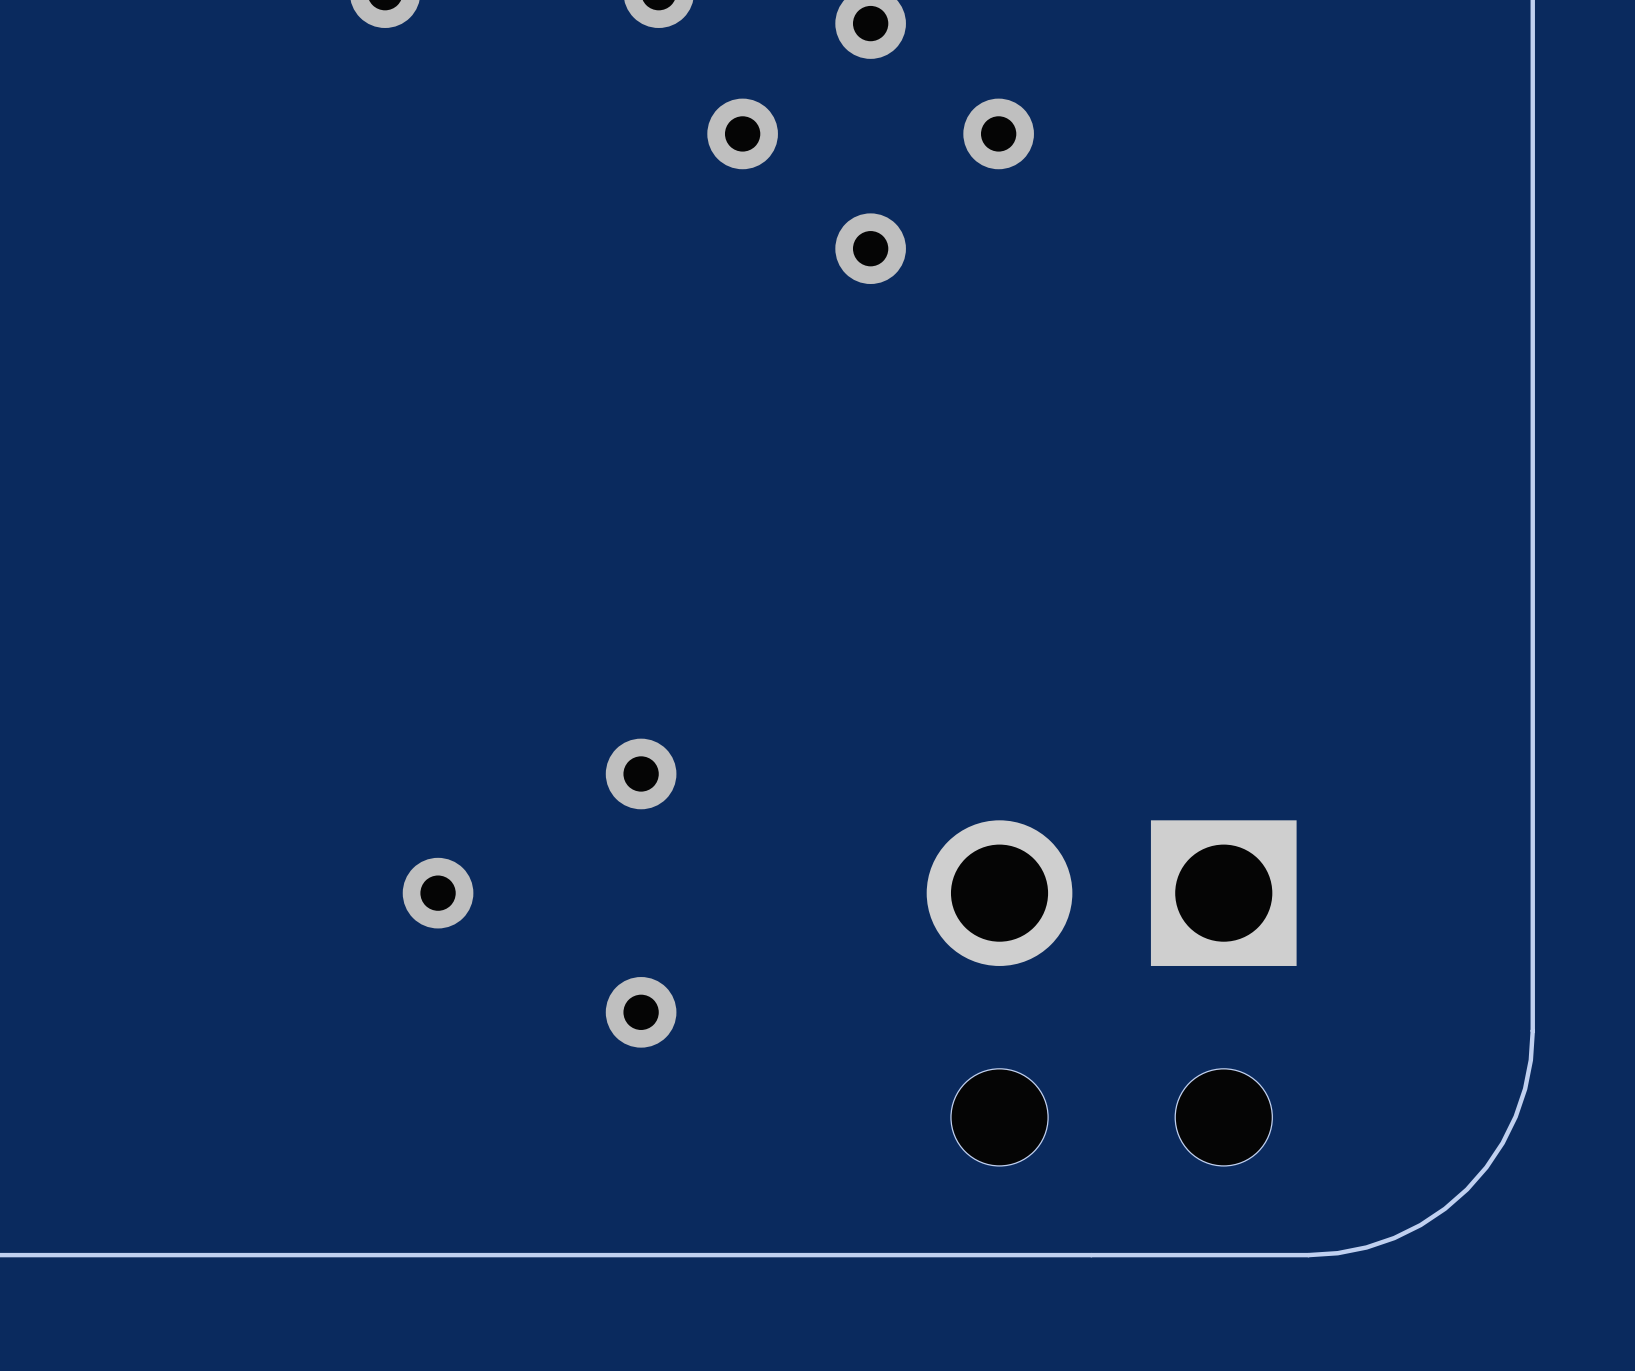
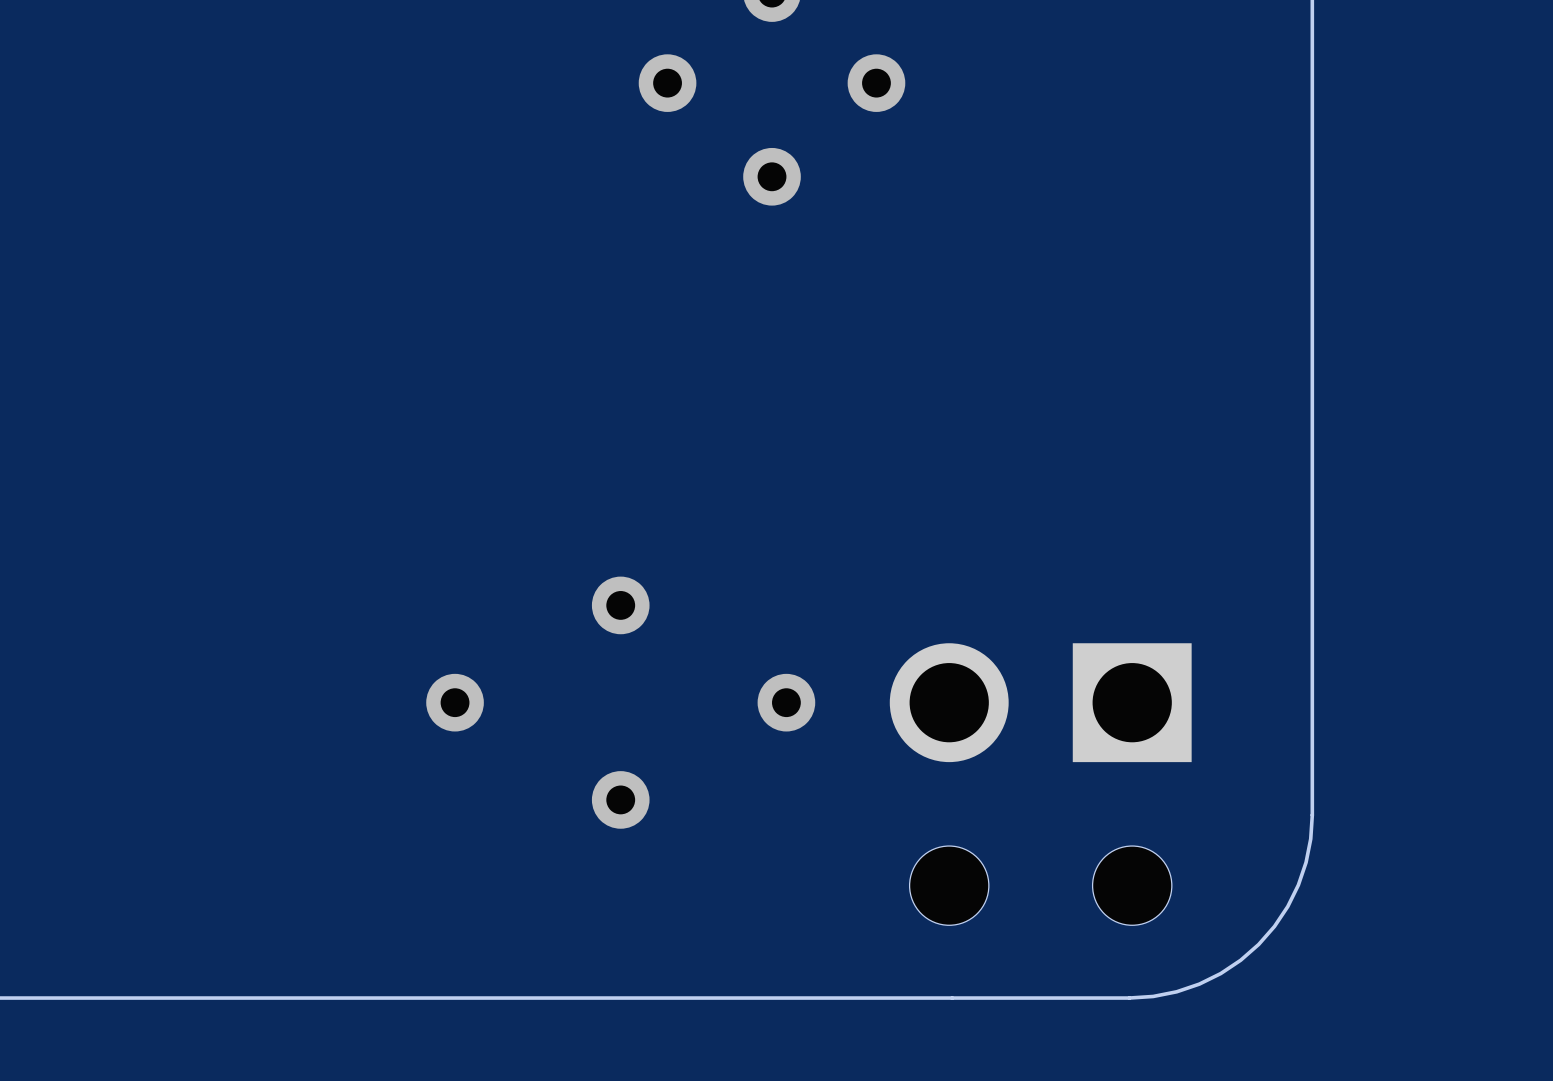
via position: (641, 773) -> (620, 605)
via position: (438, 893) -> (455, 702)
via: none -> (786, 702)
part position: (1111, 993) -> (1040, 784)
via position: (641, 1012) -> (620, 799)

